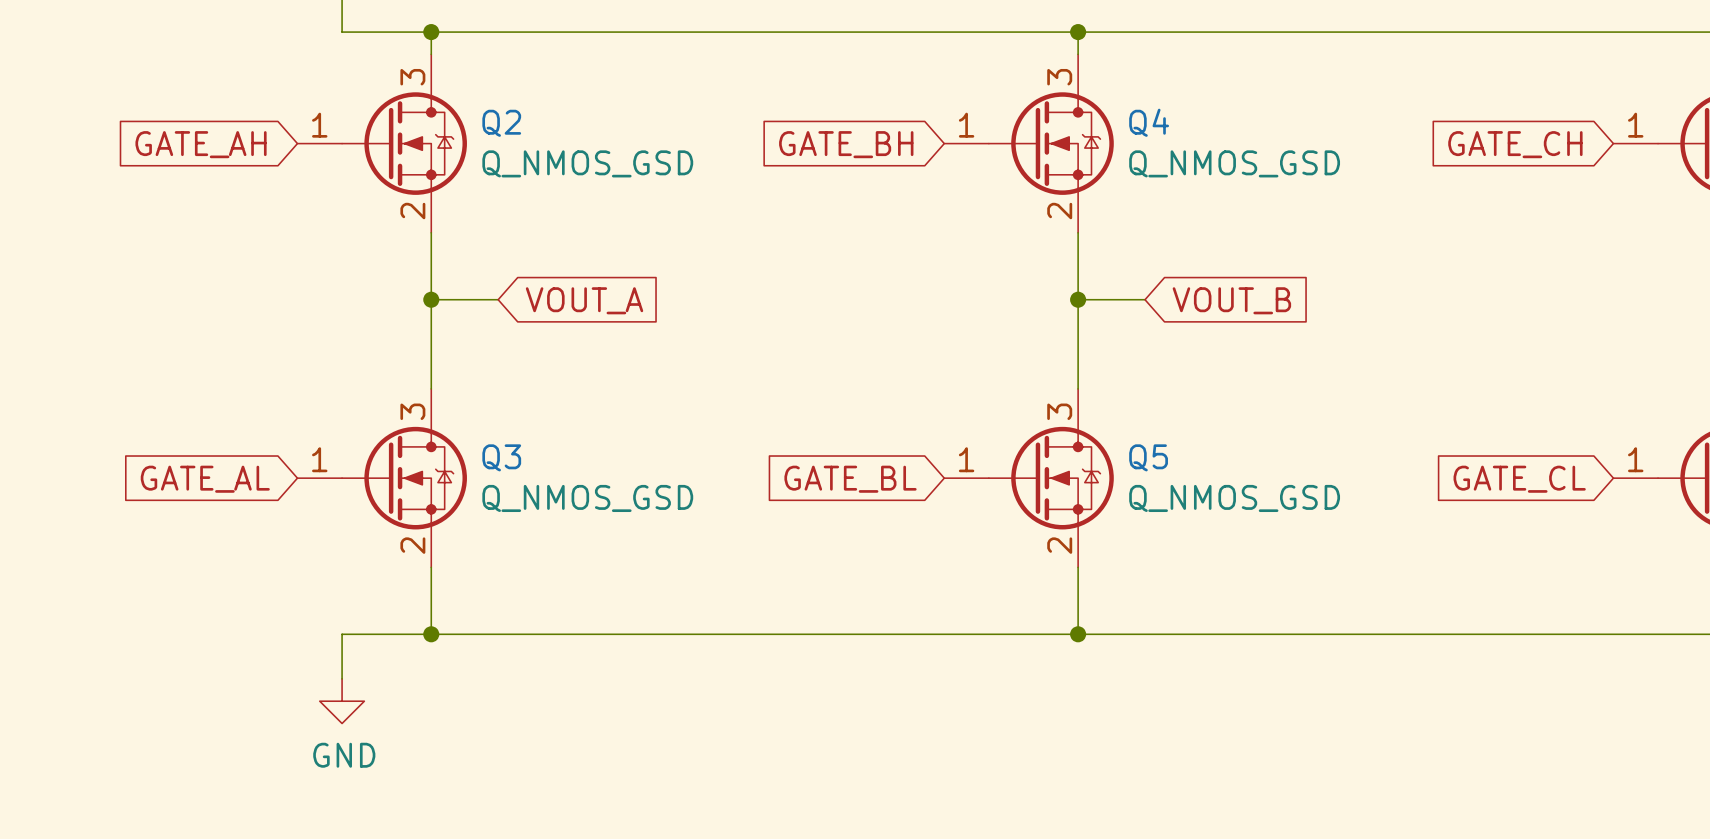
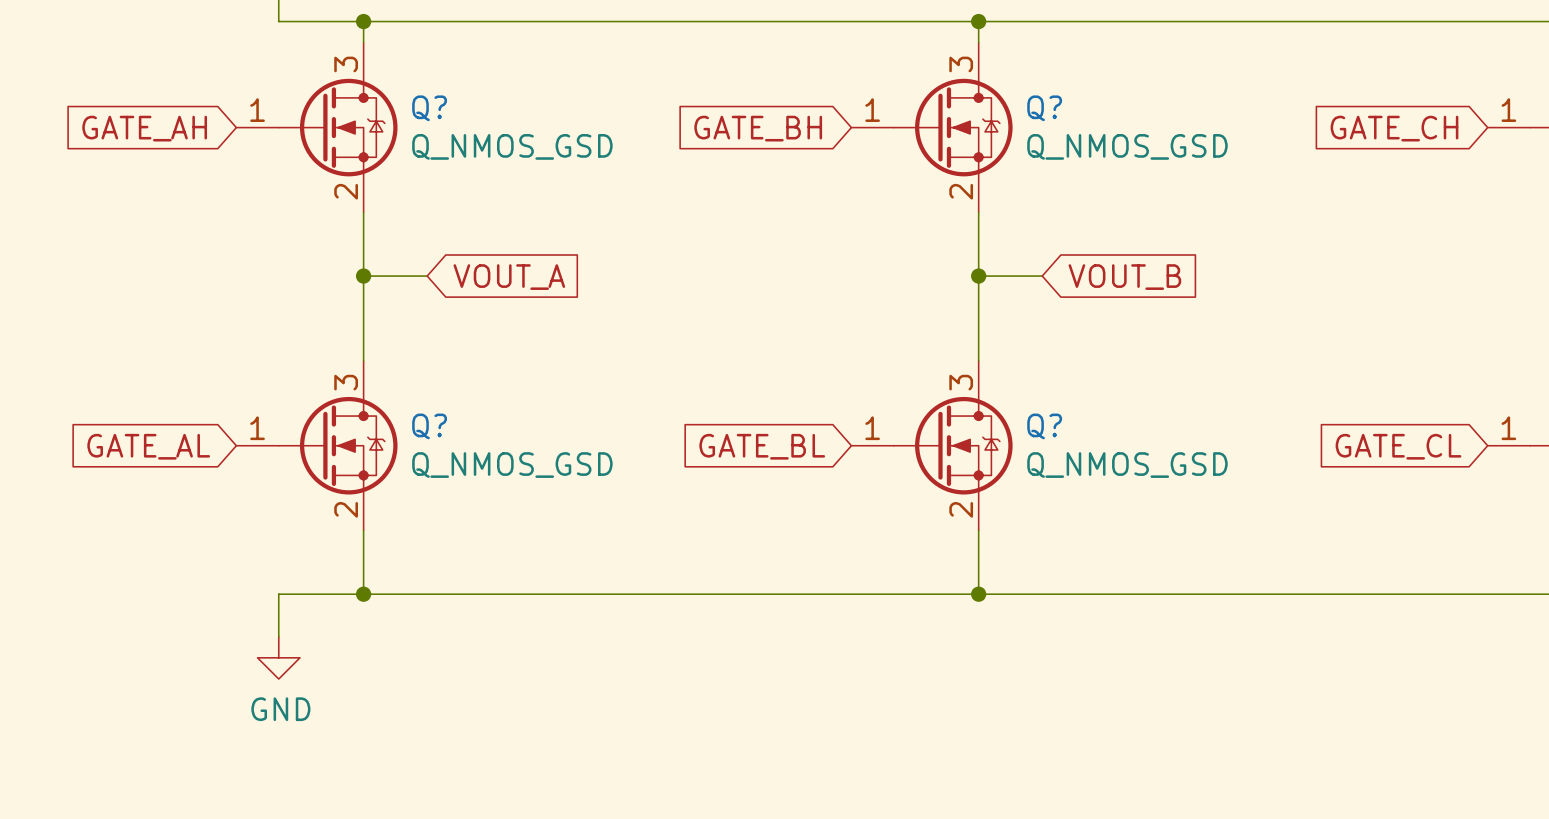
Q4 name: Q4 (1149, 122) -> Q? (1044, 108)
Q2 name: Q2 (501, 123) -> Q? (429, 108)
Q3 name: Q3 (501, 457) -> Q? (429, 426)
Q5 name: Q5 (1148, 457) -> Q? (1044, 426)

